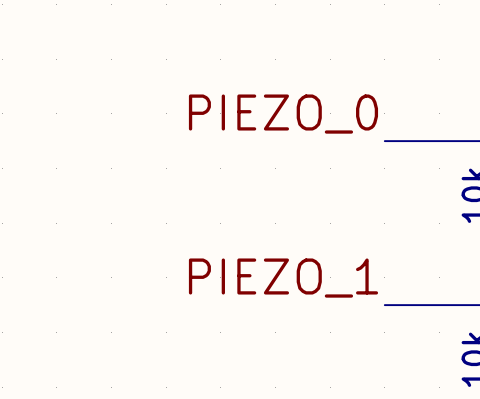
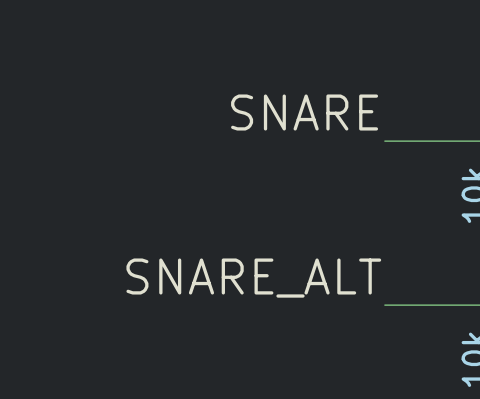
label: PIEZO_0 (283, 114) -> SNARE (304, 112)
label: PIEZO_1 (283, 278) -> SNARE_ALT (253, 278)

